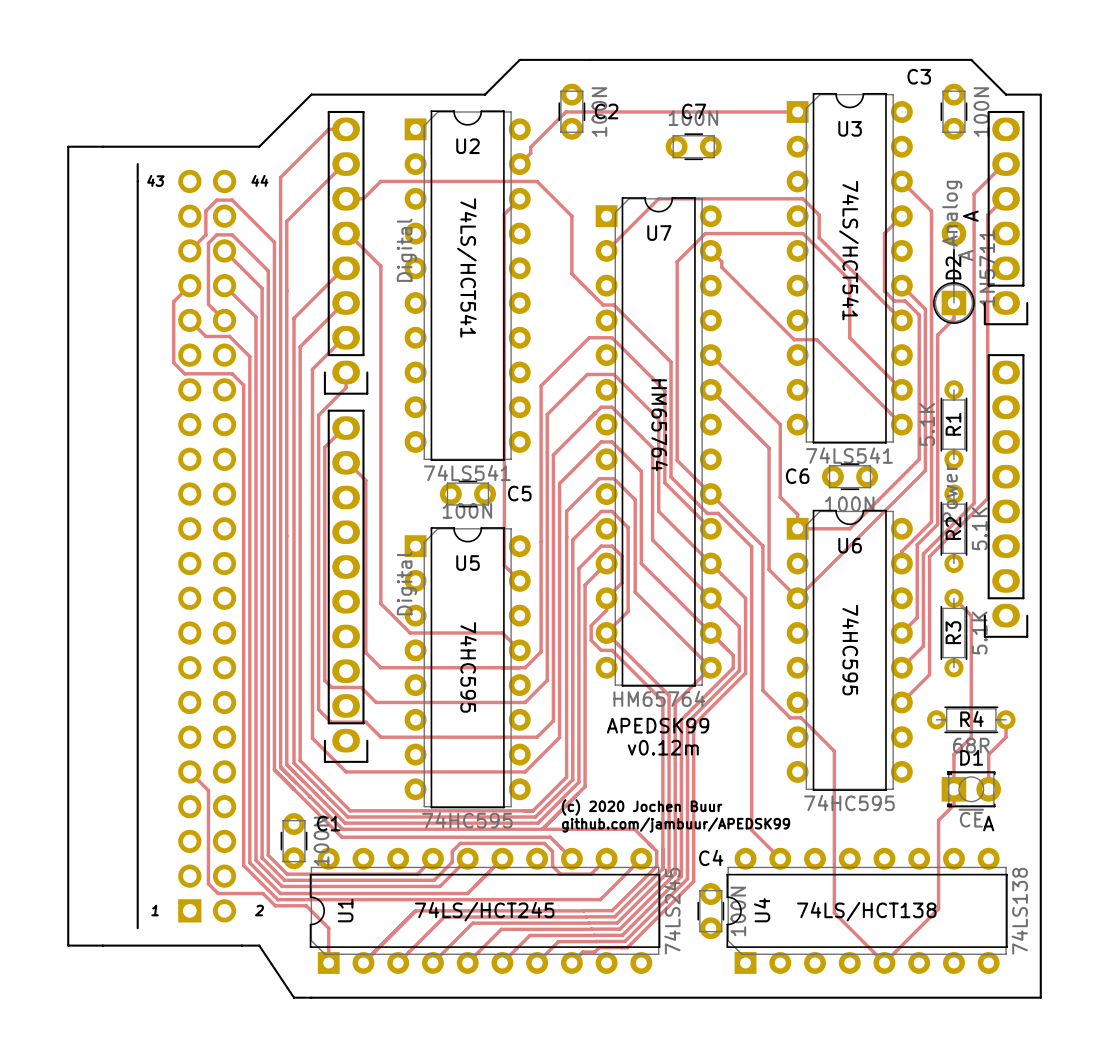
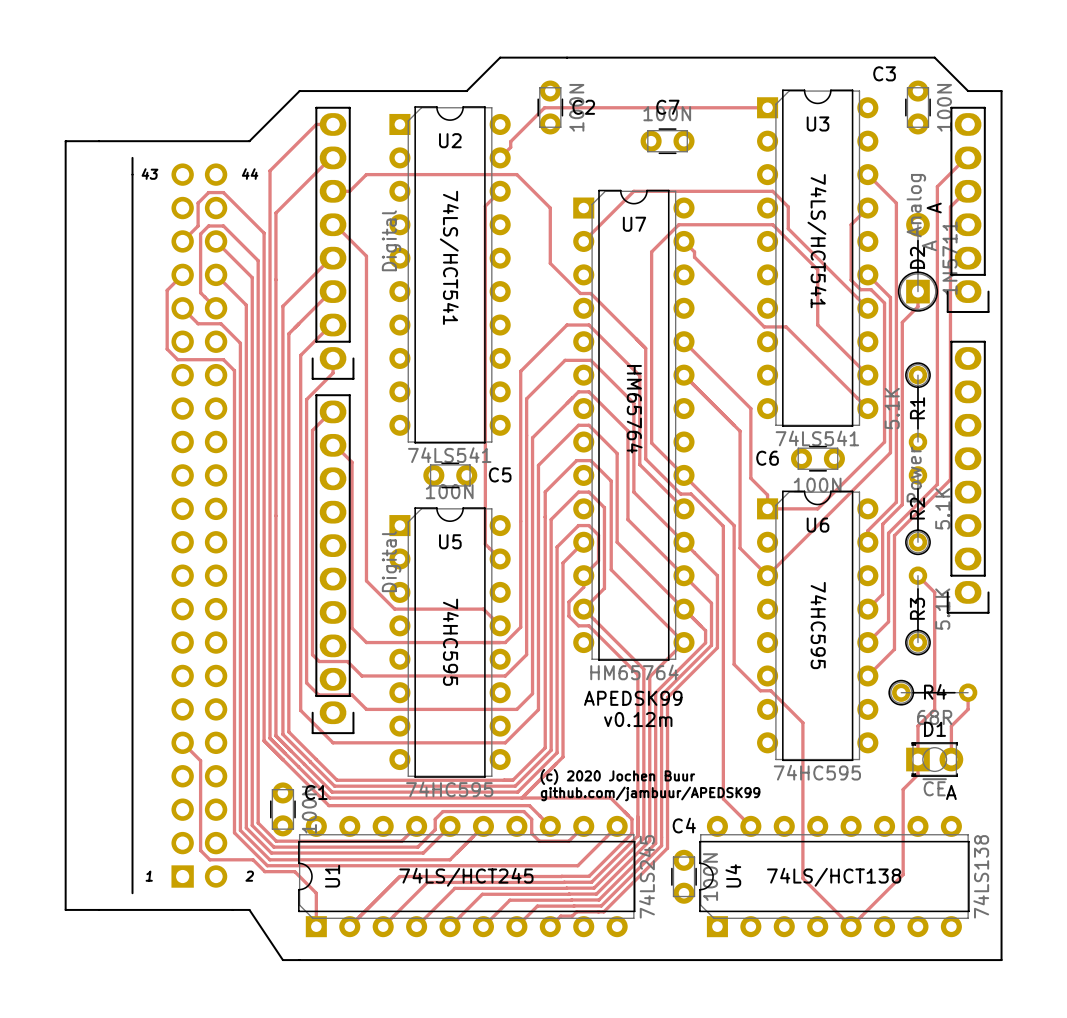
R1 footprint: [940, 380, 968, 469] -> [905, 362, 931, 452]
R2 footprint: [940, 484, 968, 574] -> [905, 466, 931, 556]
R3 footprint: [940, 588, 968, 678] -> [905, 566, 931, 656]
R4 footprint: [927, 706, 1016, 734] -> [888, 679, 978, 706]

